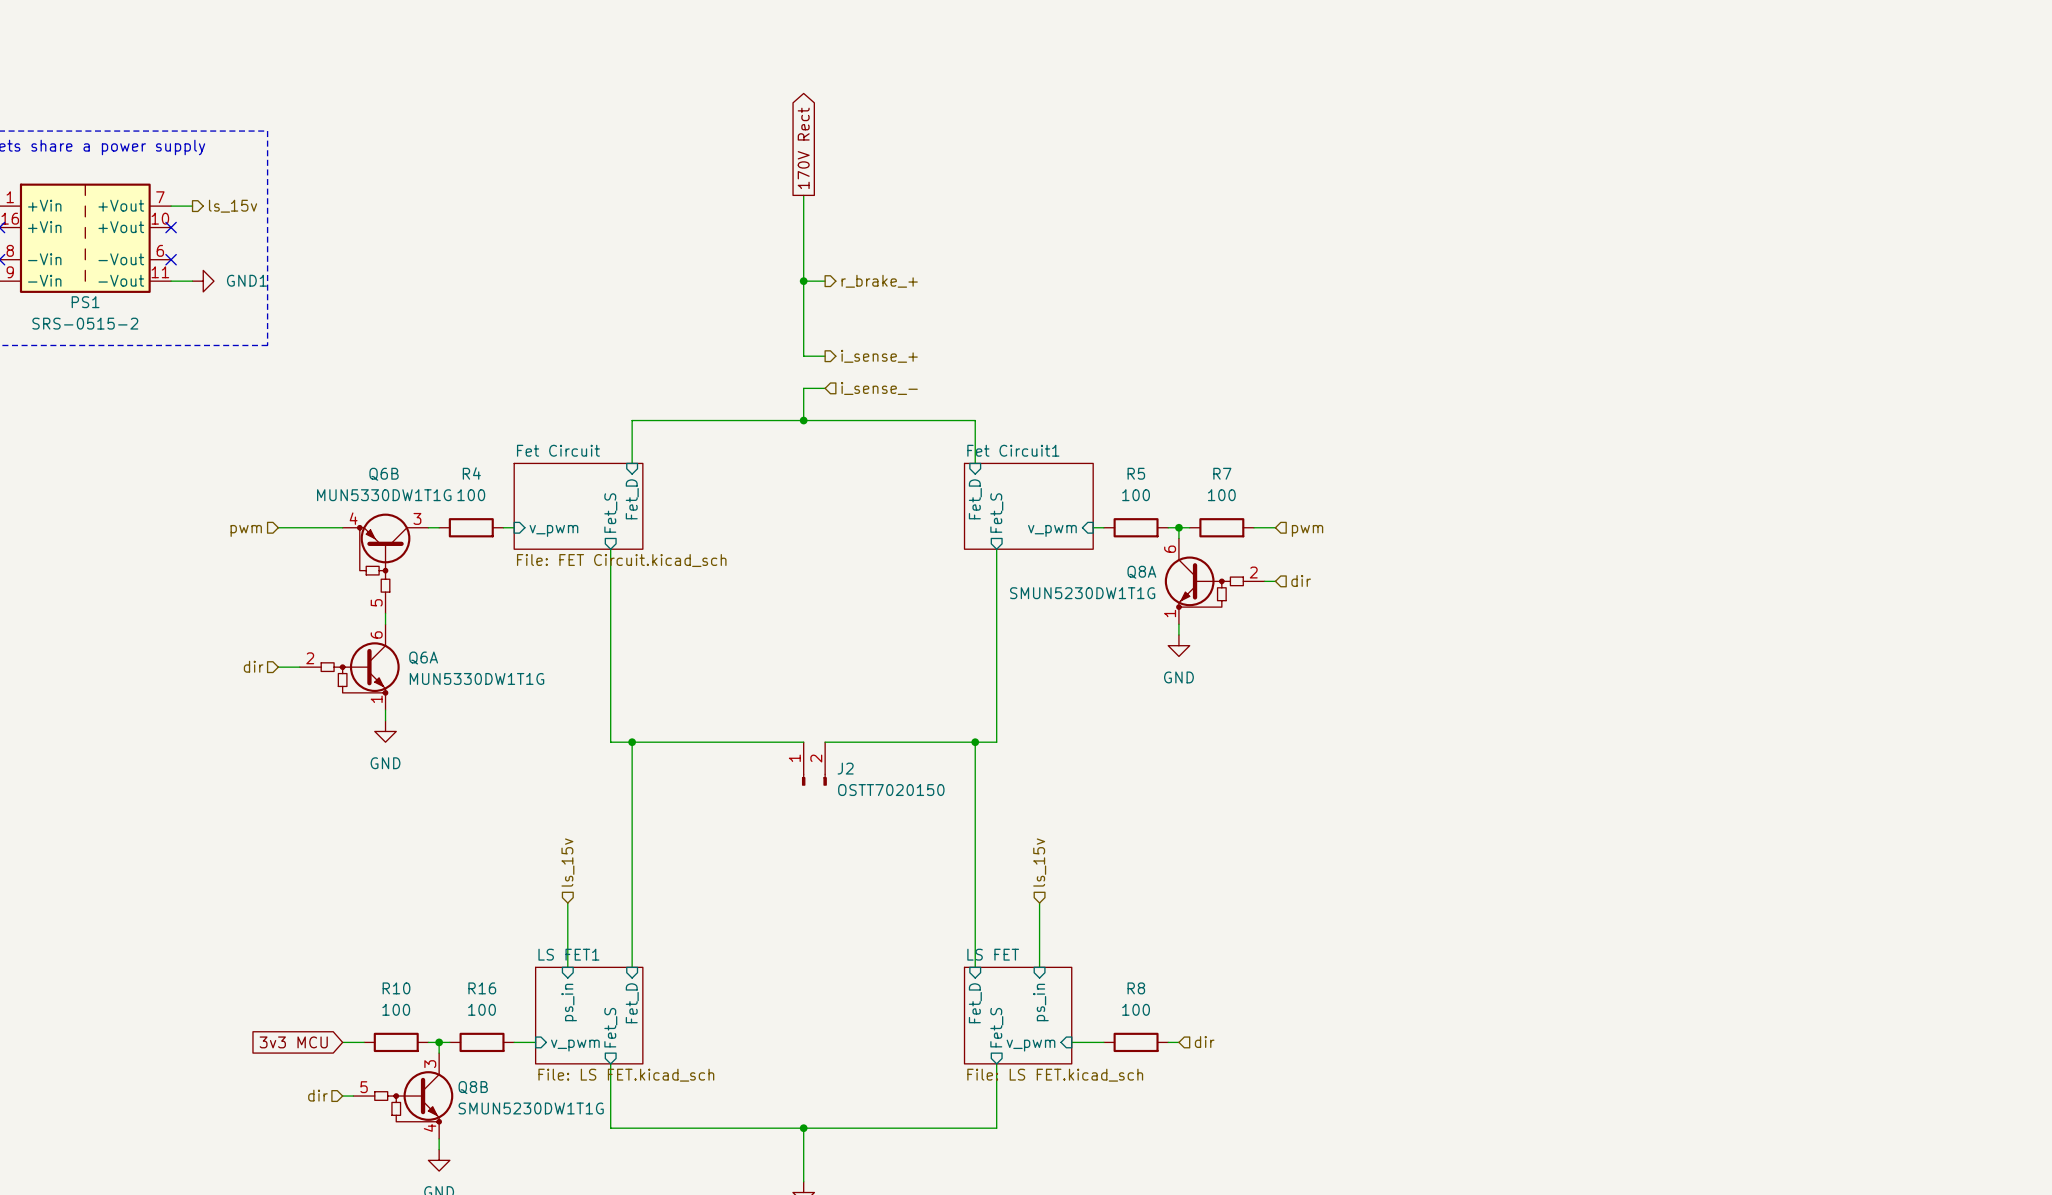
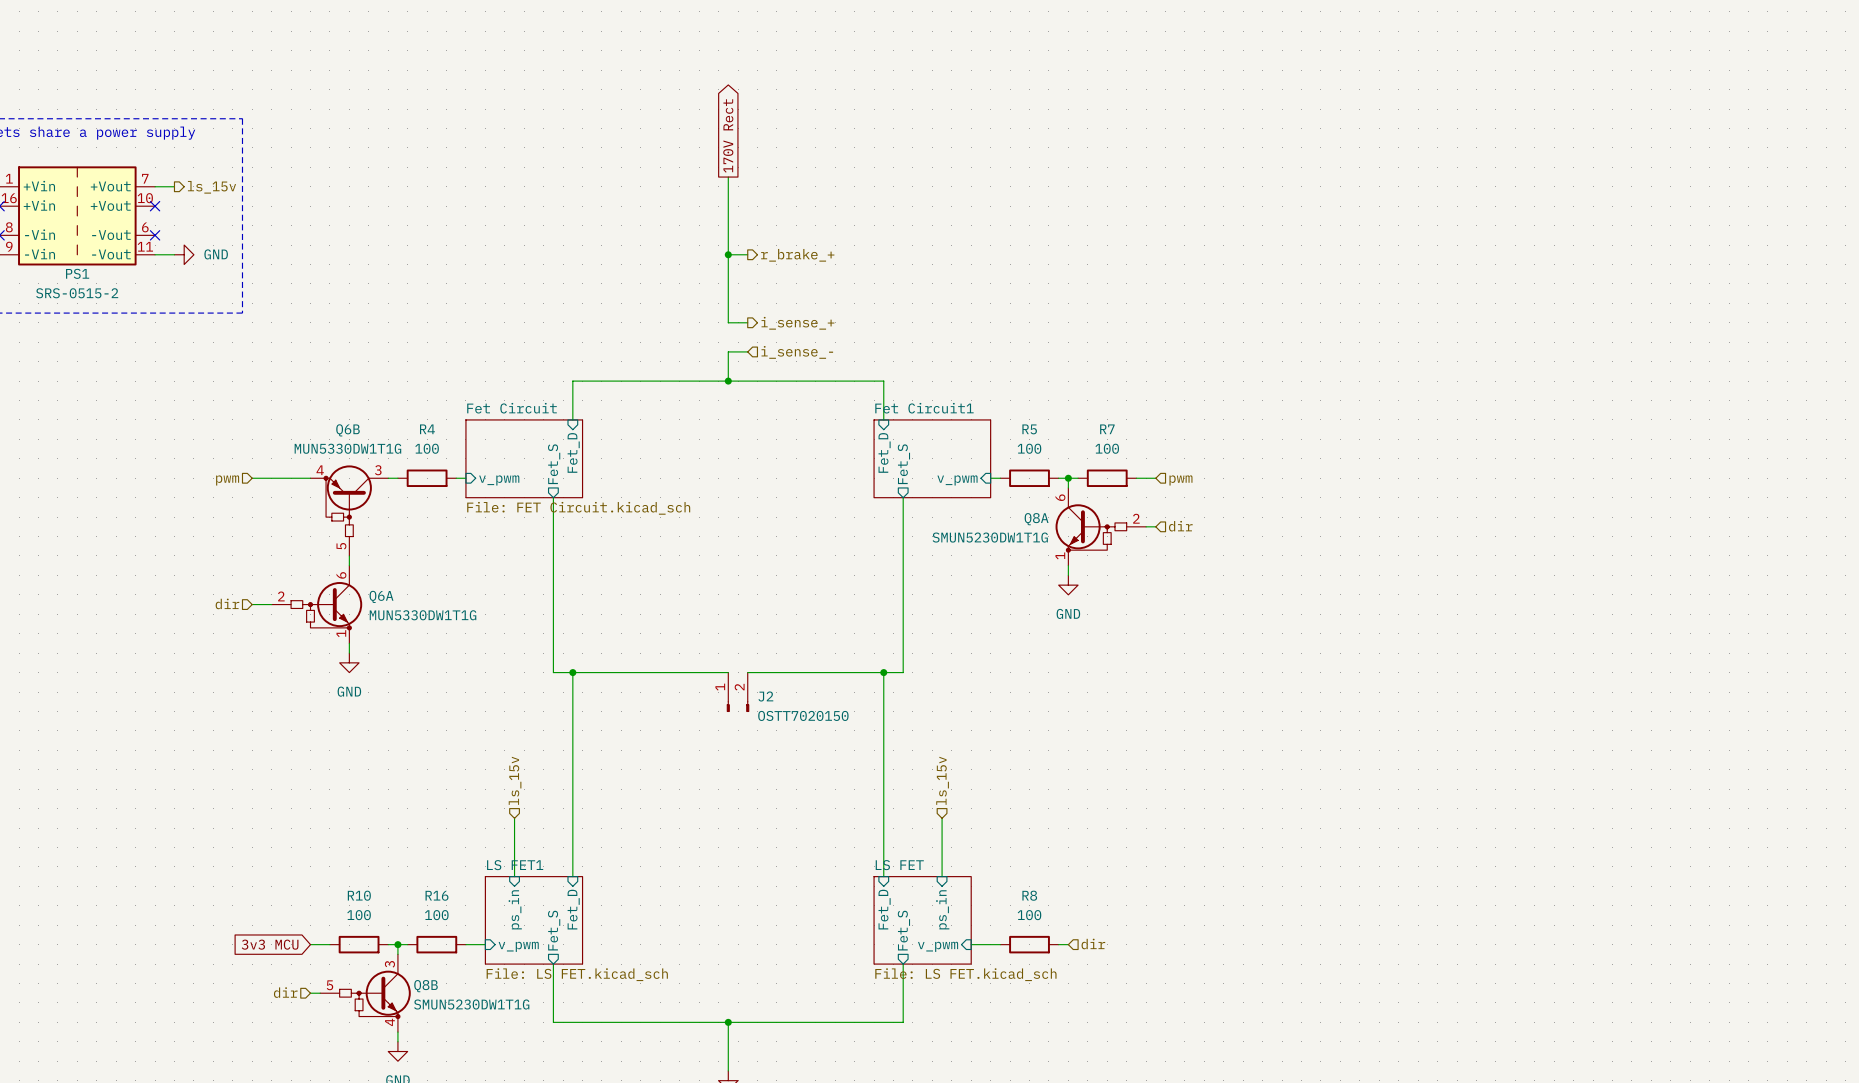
power symbol: GND1 (203, 281) -> GND (184, 254)

